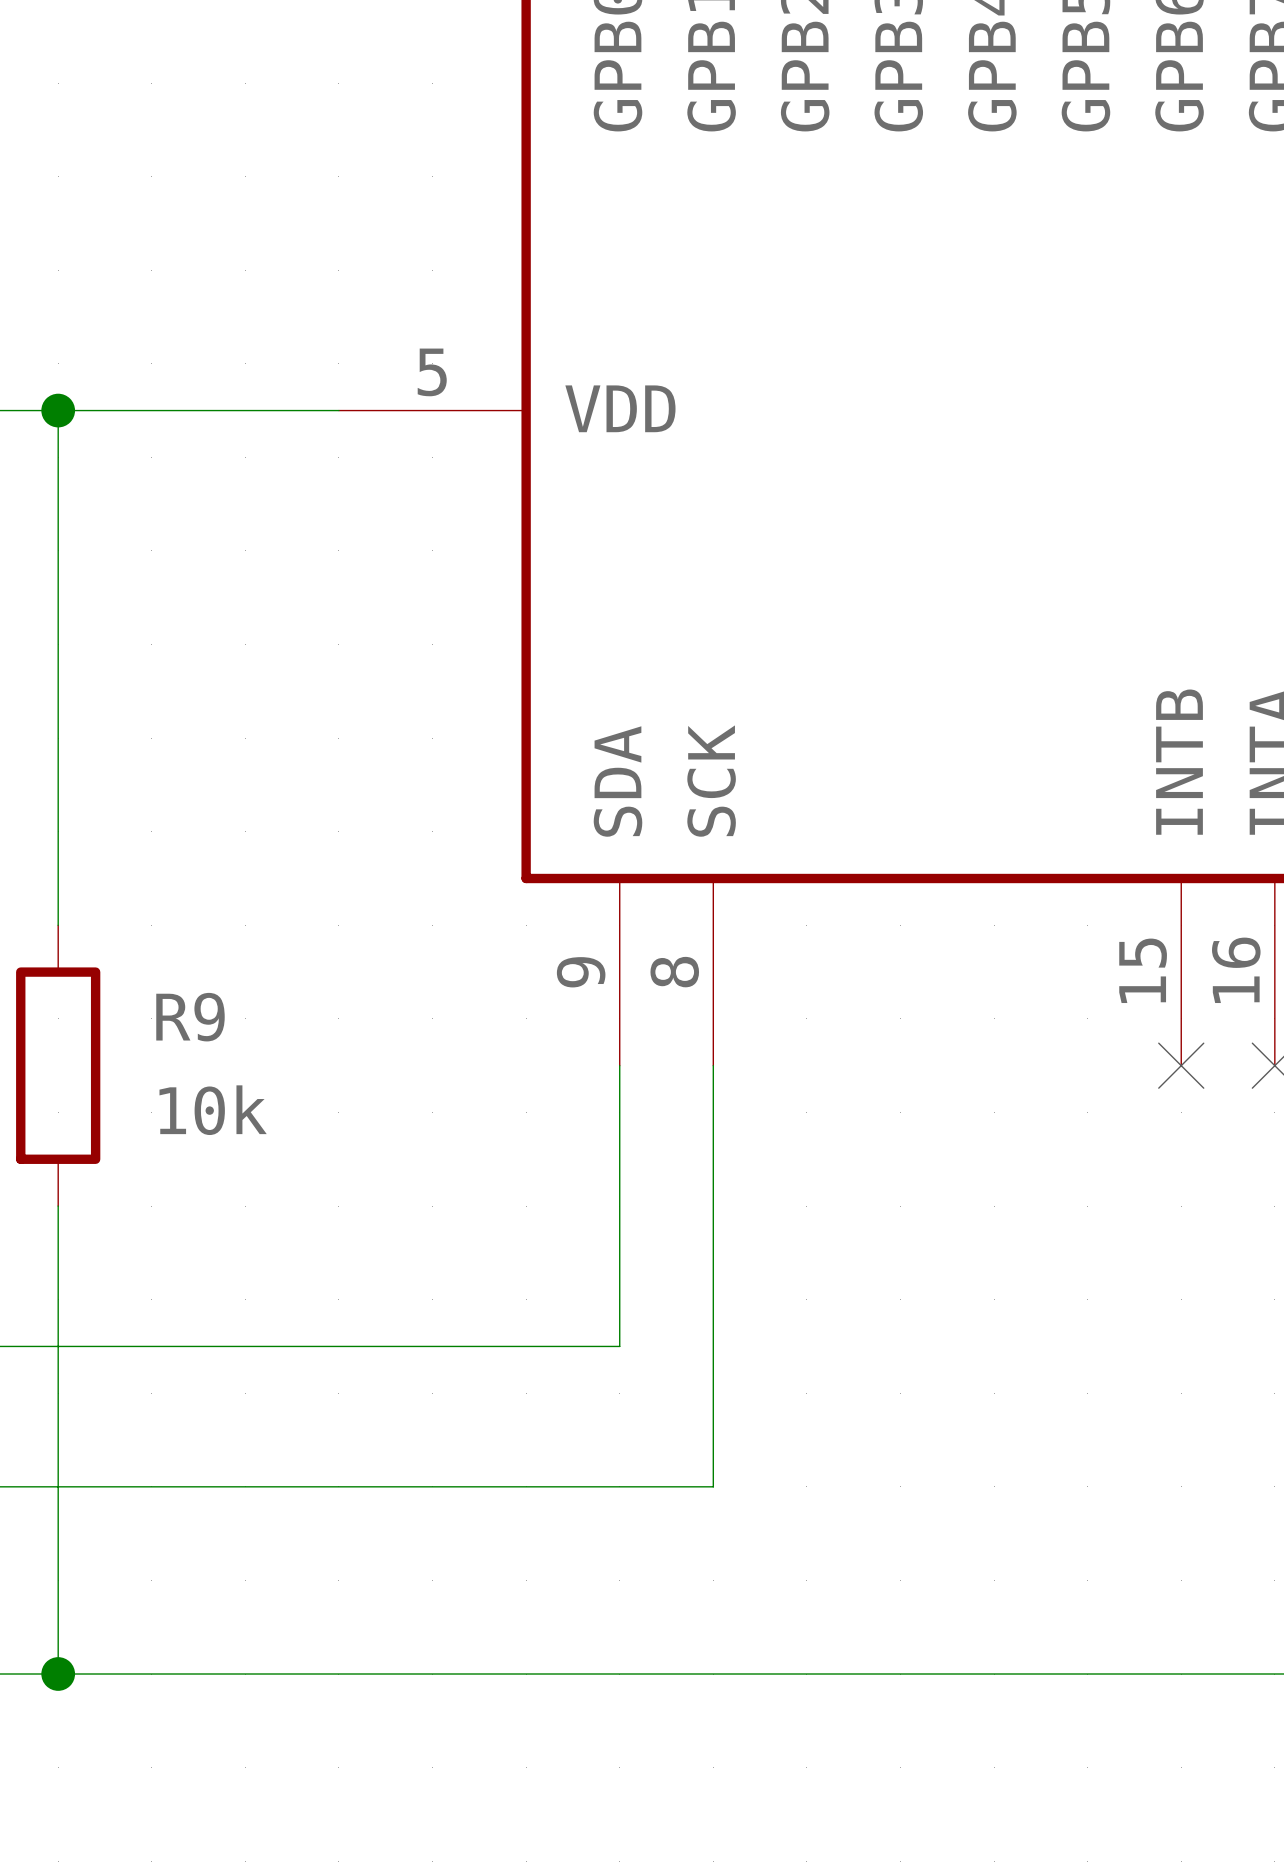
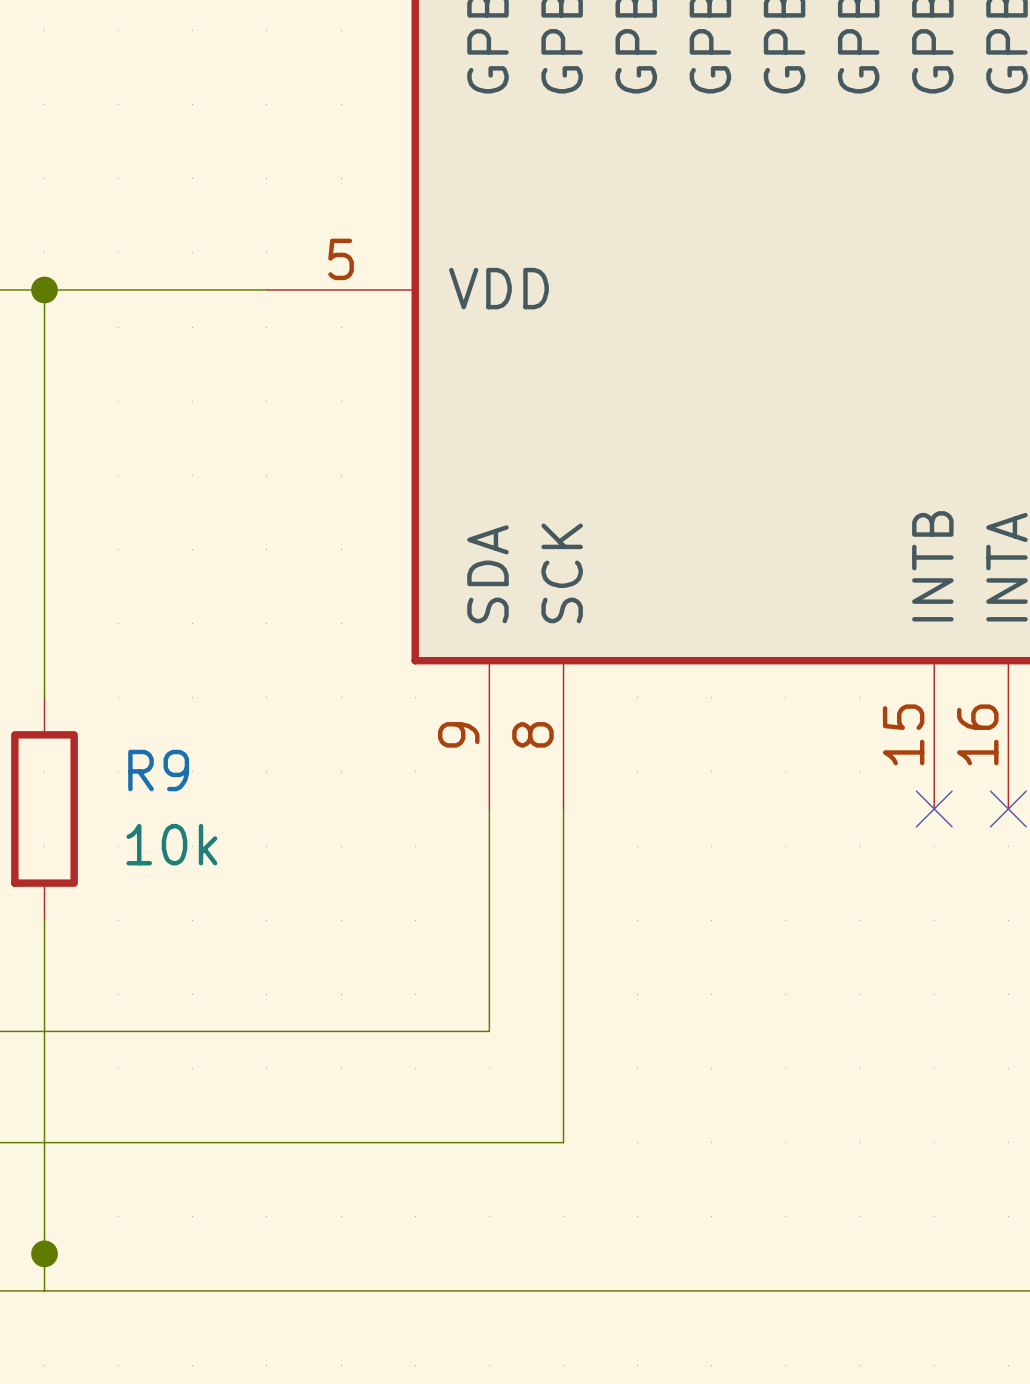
junction position: (58, 1674) -> (44, 1253)

